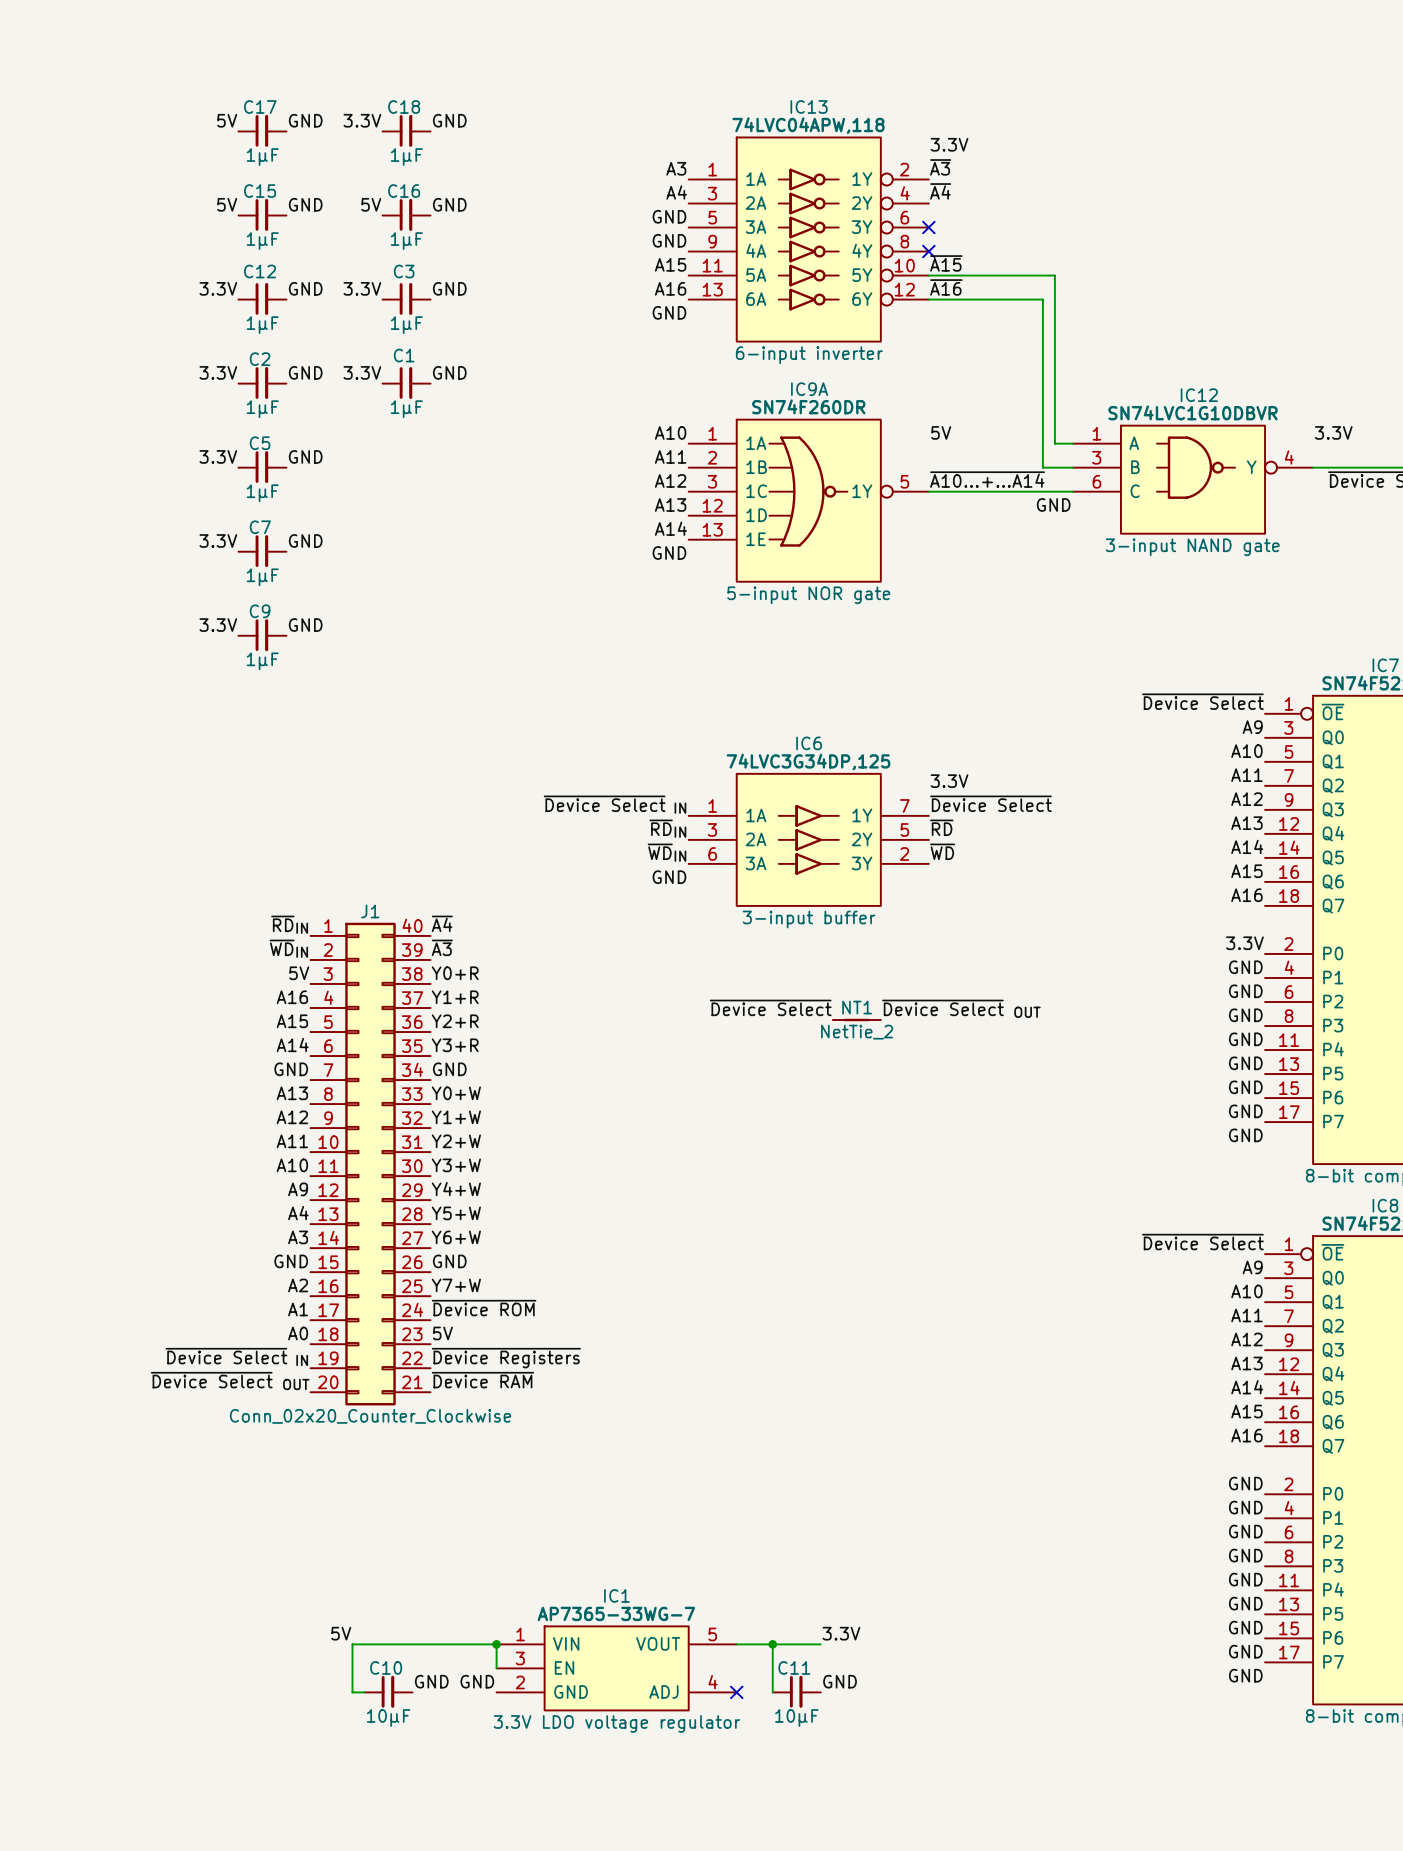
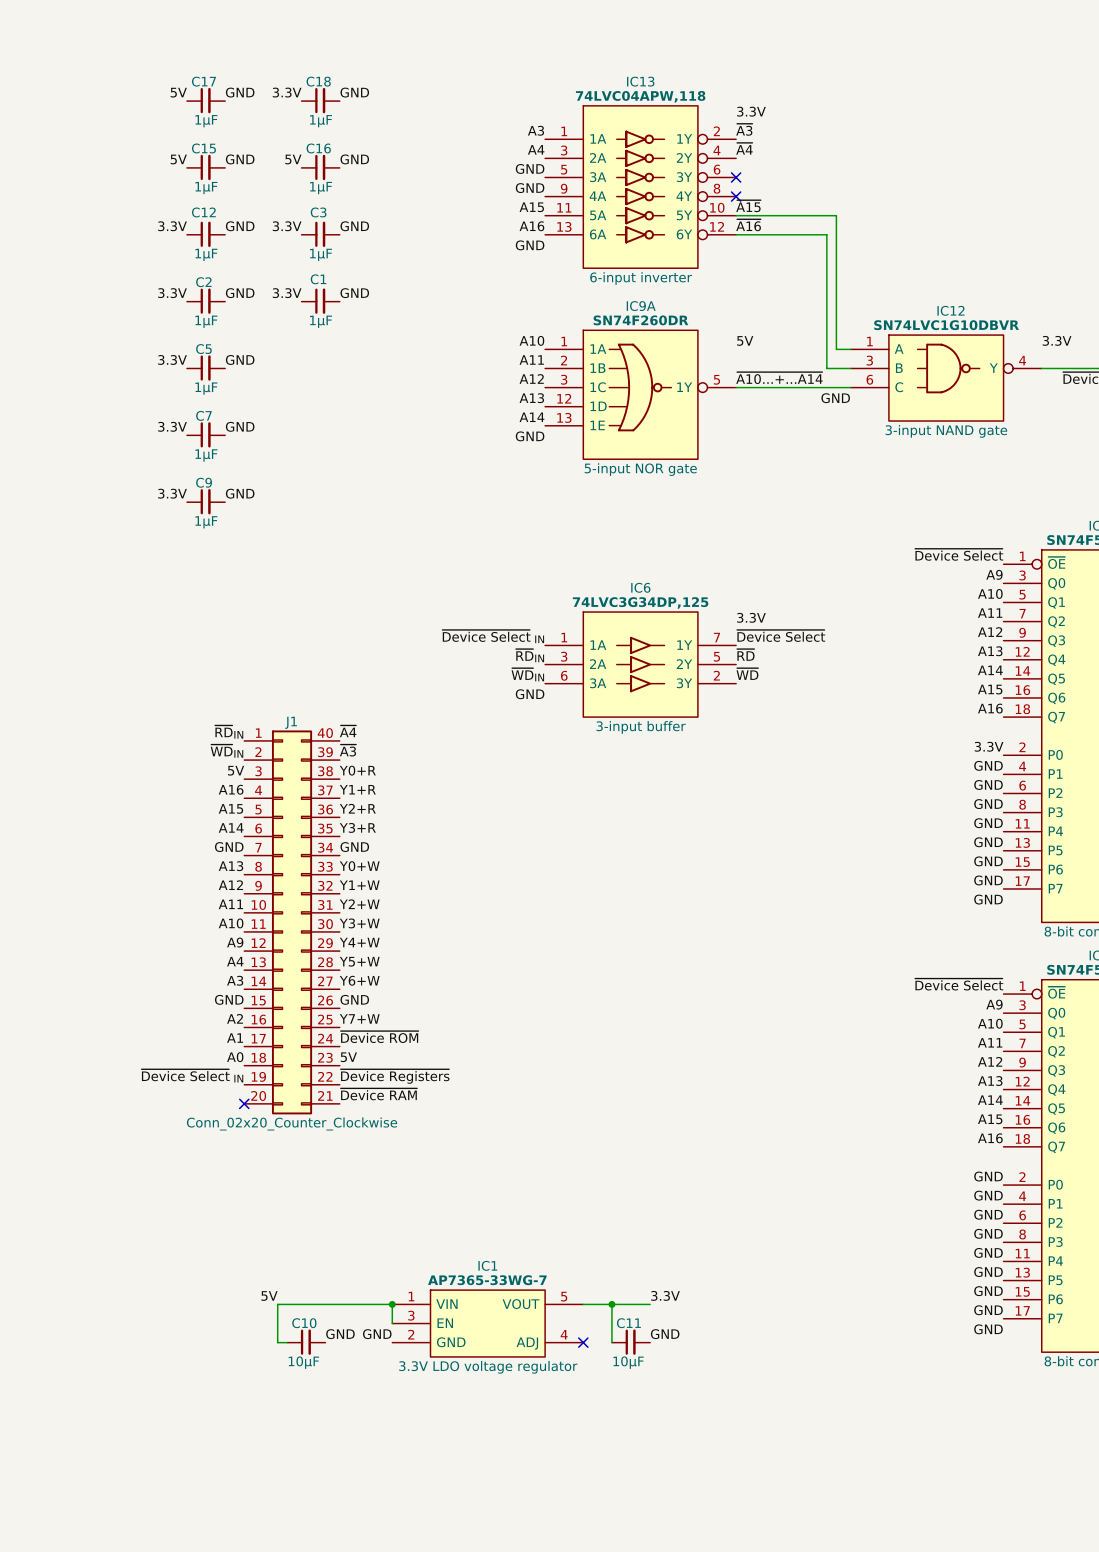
label: ~{Device Select} (770, 1007) -> none
label: ~{Device Select} OUT (961, 1008) -> none
NT1: NetTie_2 (856, 1020) -> none
label: ~{Device Select} OUT (230, 1381) -> none
no-connect mark: none -> (244, 1103)

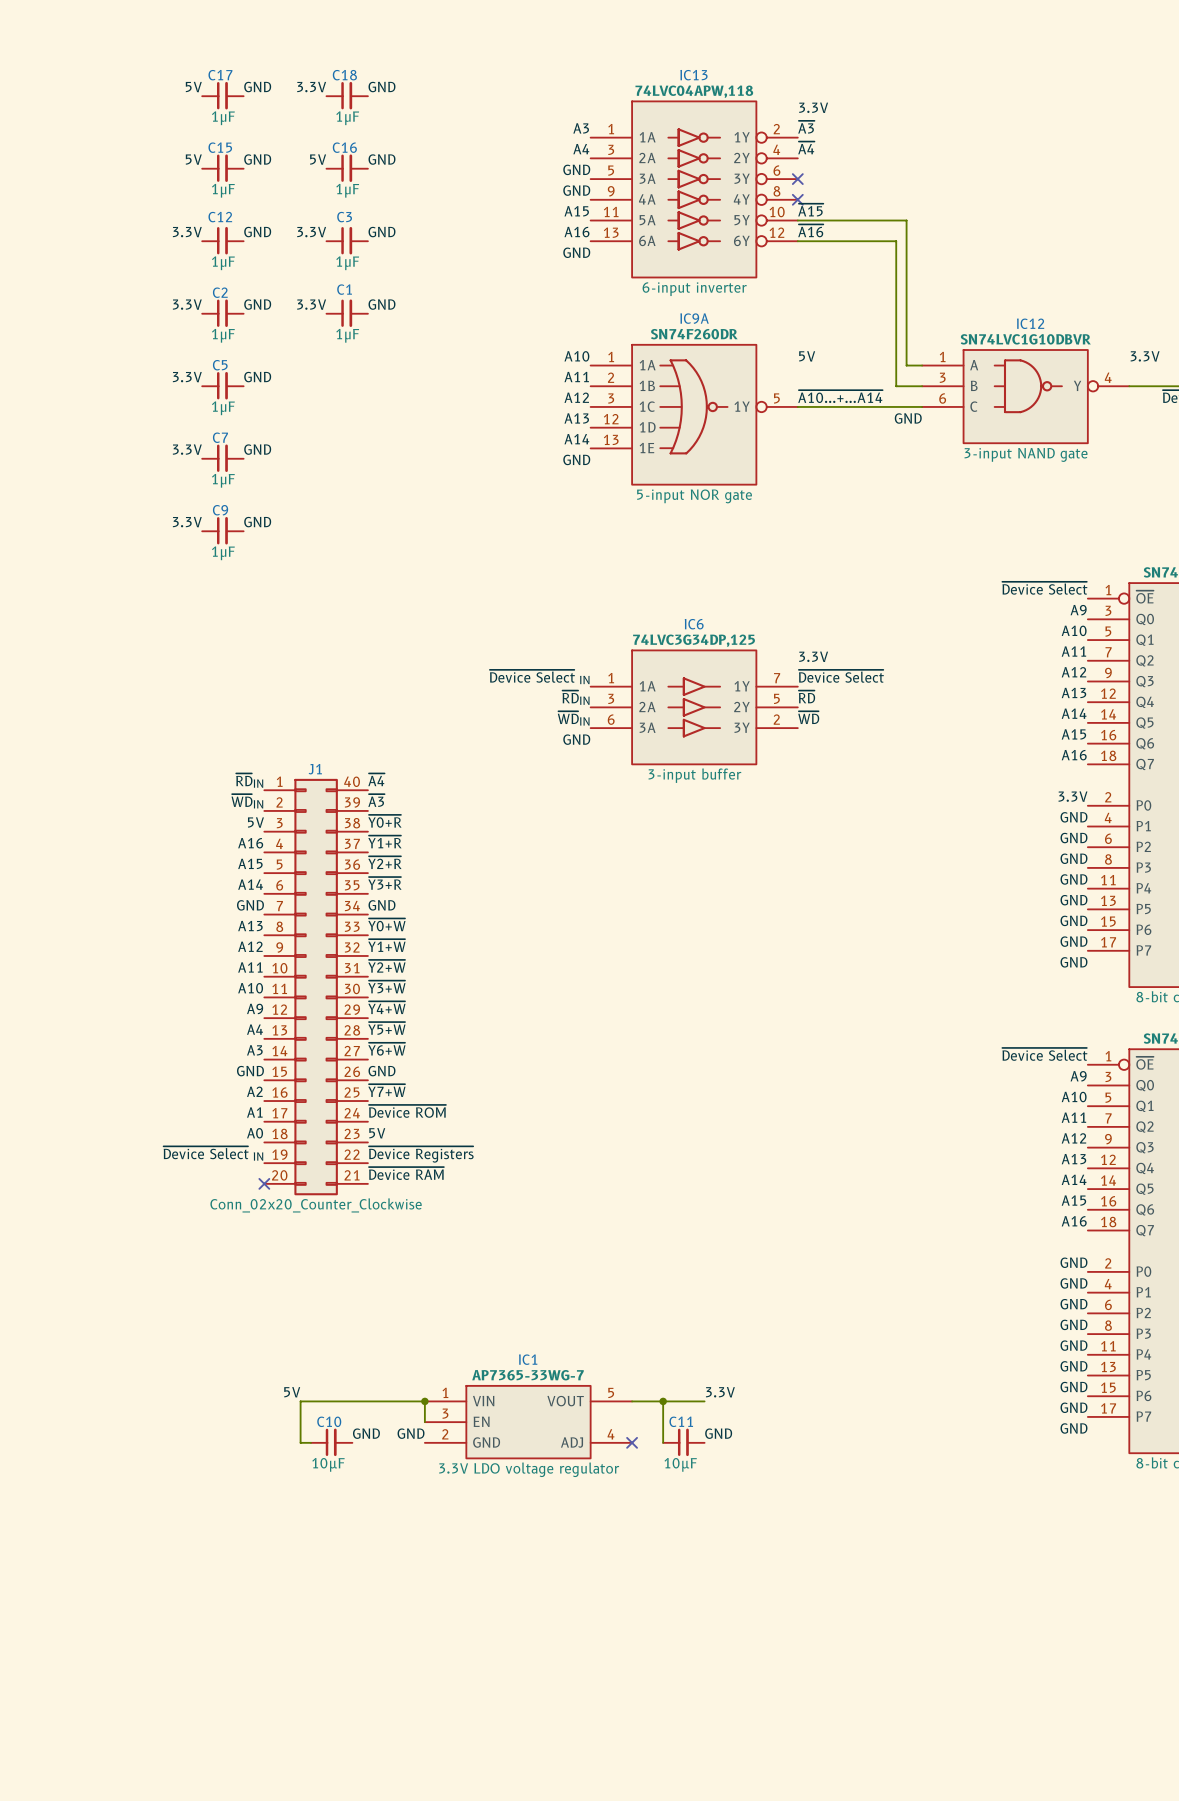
label: Y0+R (357, 770) -> ~{Y0+R} (384, 821)
label: Y1+R (357, 789) -> ~{Y1+R} (384, 841)
label: Y2+R (357, 808) -> ~{Y2+R} (384, 862)
label: Y3+R (357, 827) -> ~{Y3+R} (384, 883)
label: Y0+W (359, 866) -> ~{Y0+W} (386, 924)
label: Y1+W (359, 885) -> ~{Y1+W} (386, 945)
label: Y2+W (359, 904) -> ~{Y2+W} (386, 966)
label: Y3+W (359, 923) -> ~{Y3+W} (386, 986)
label: Y4+W (359, 942) -> ~{Y4+W} (386, 1007)
label: Y5+W (359, 961) -> ~{Y5+W} (386, 1028)
label: Y6+W (359, 980) -> ~{Y6+W} (386, 1049)
label: Y7+W (359, 1018) -> ~{Y7+W} (386, 1090)

